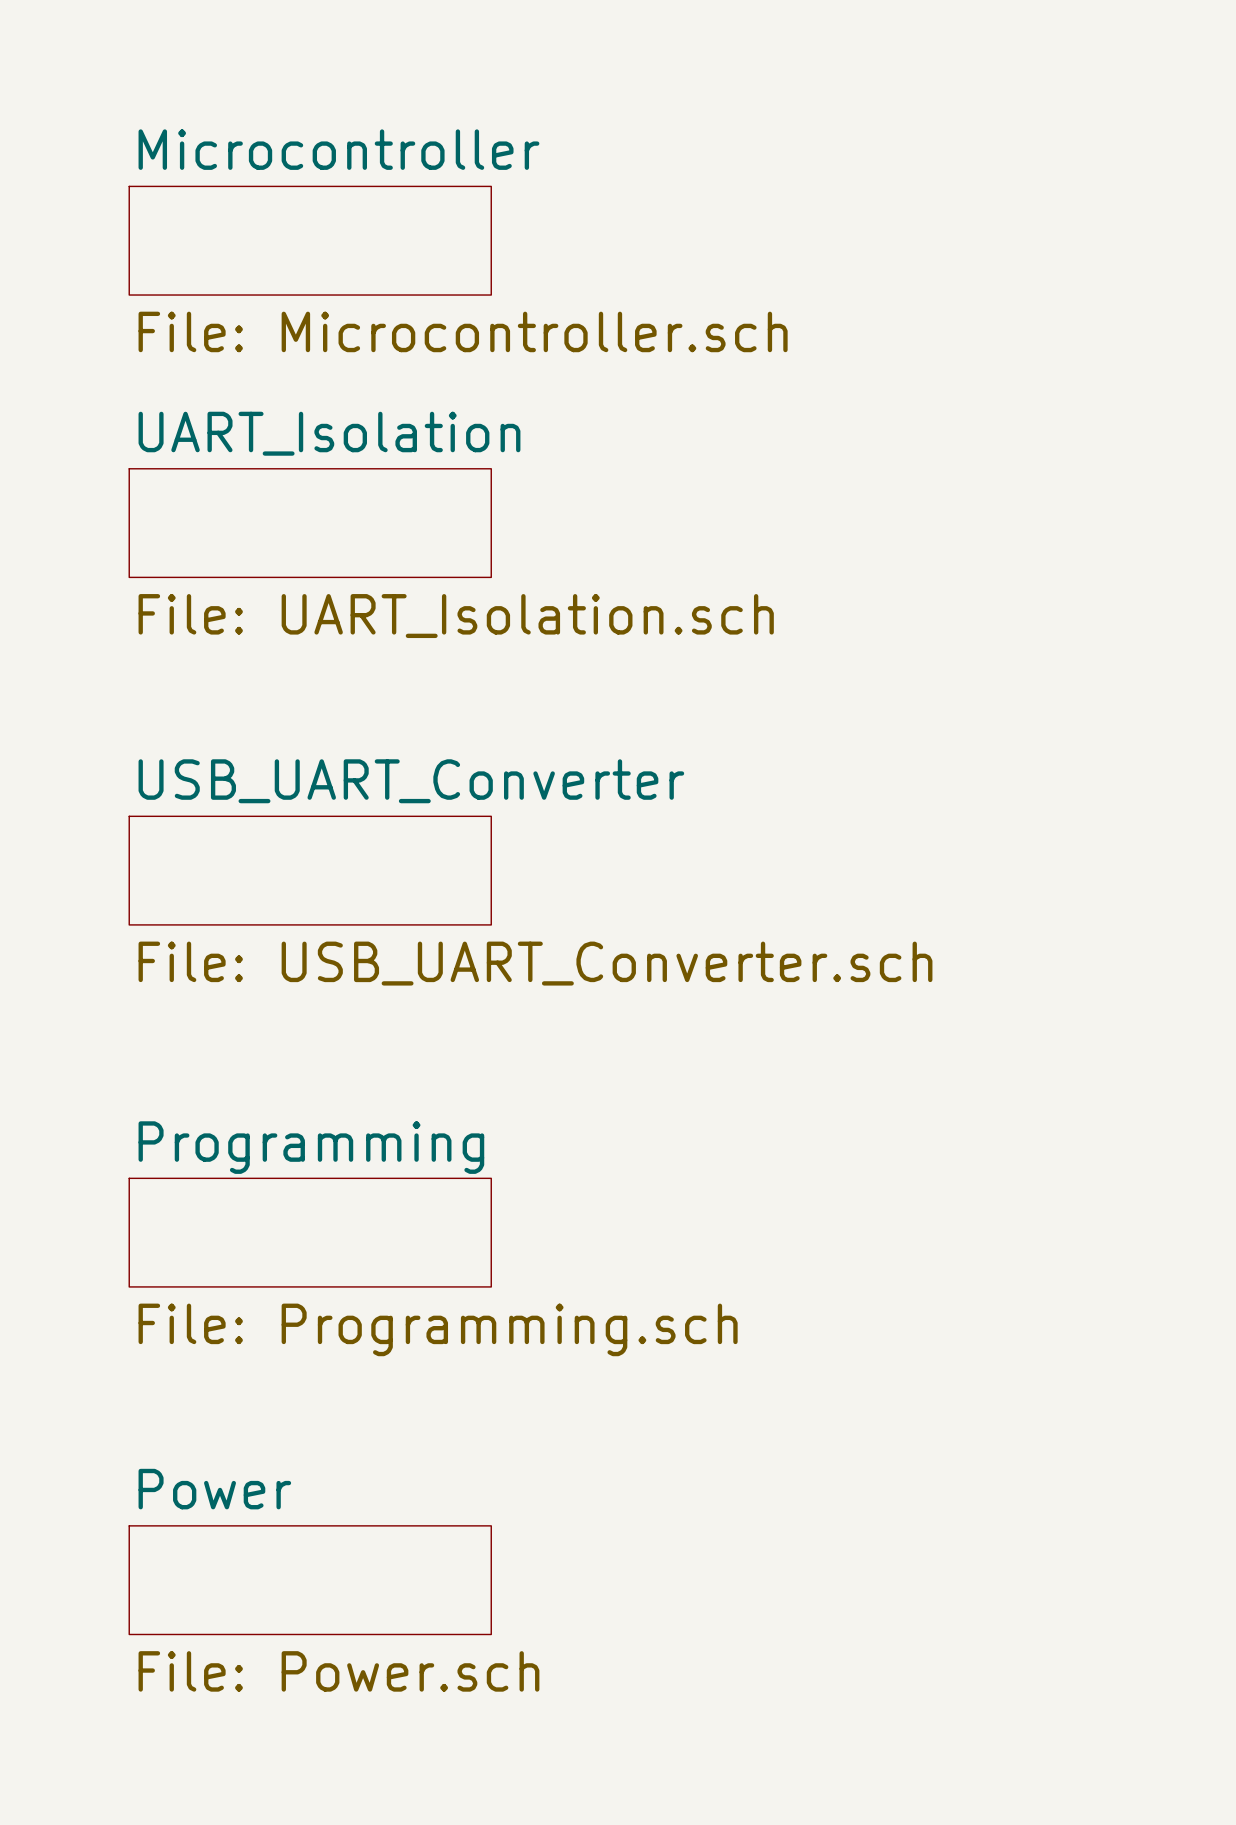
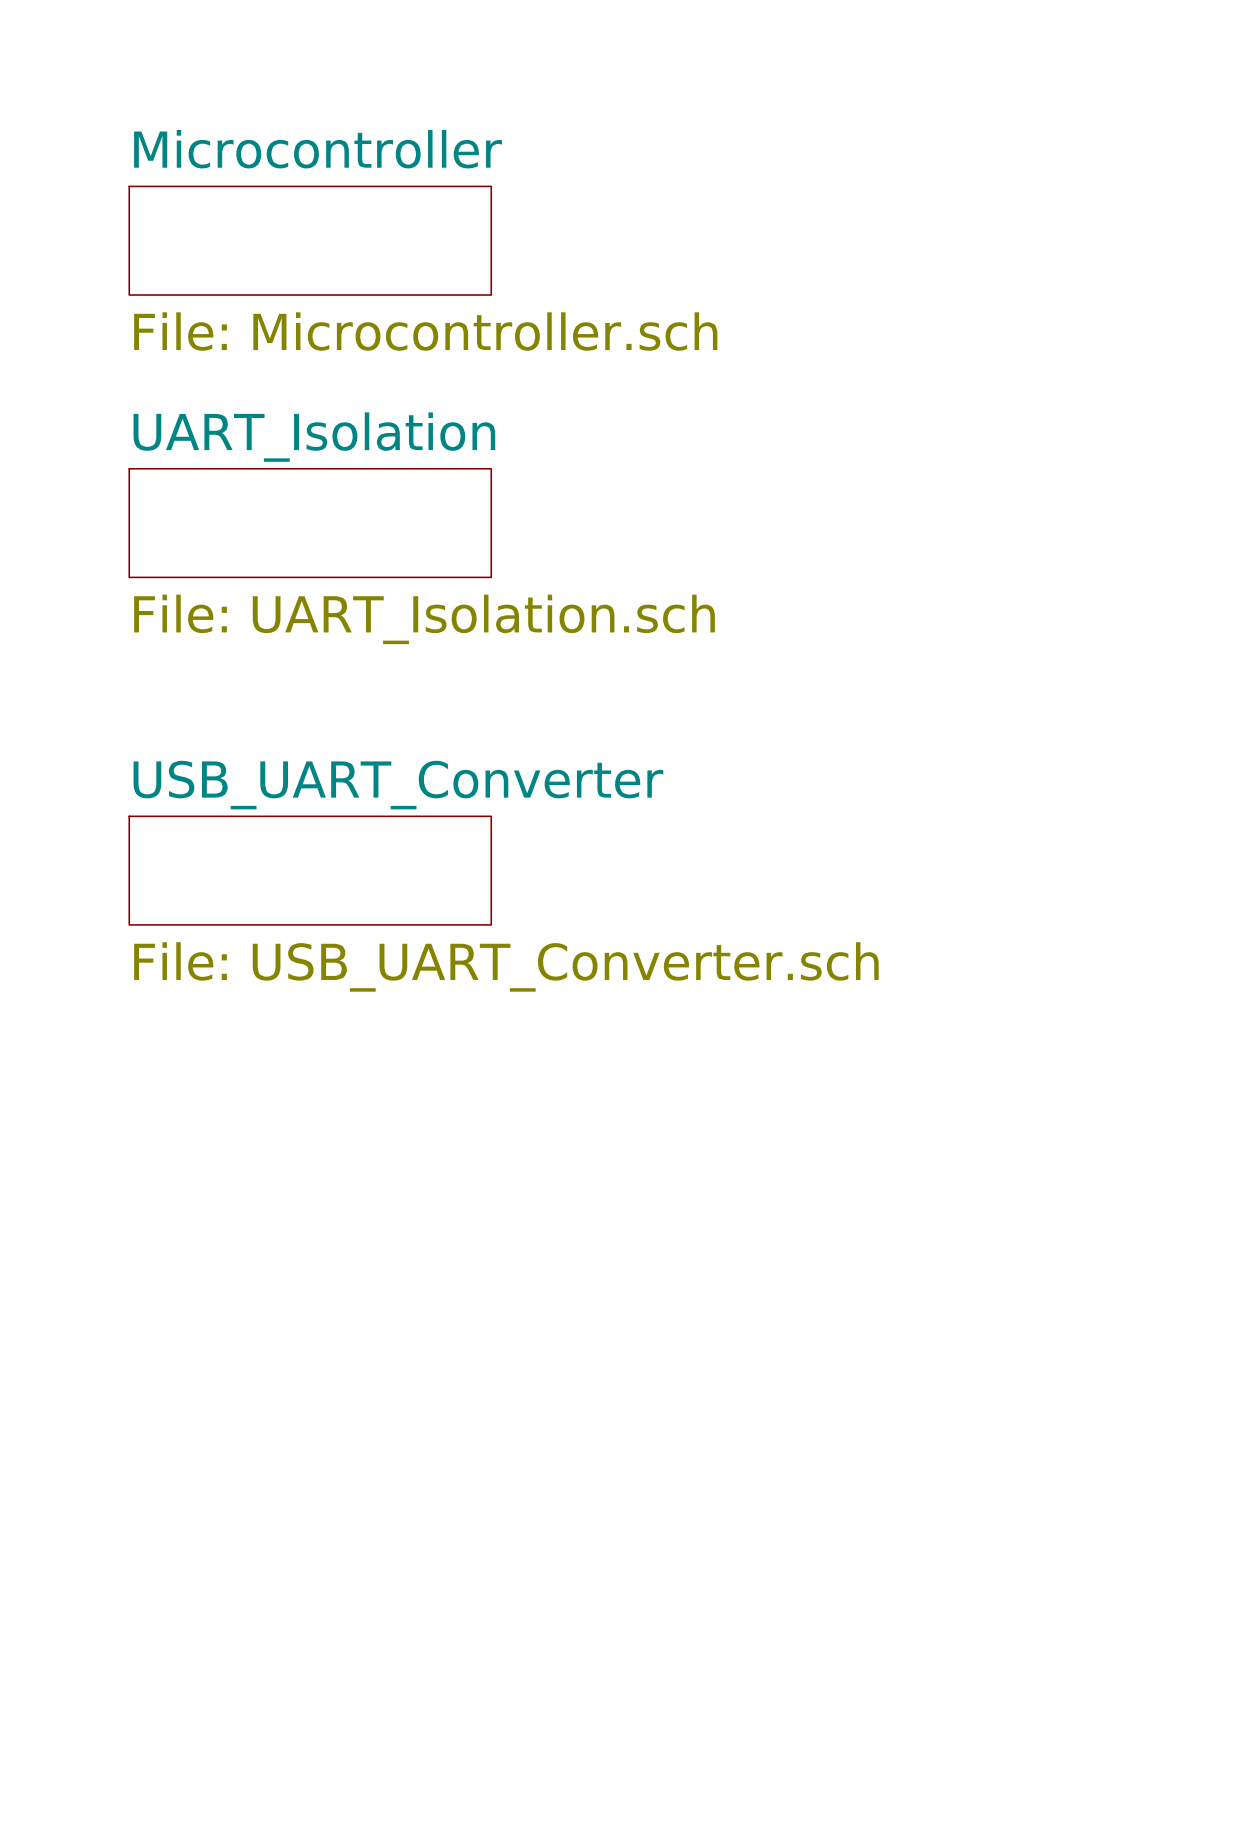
sheet Programming: File: Programming.sch (310, 1232) -> none
sheet Power: File: Power.sch (310, 1580) -> none

